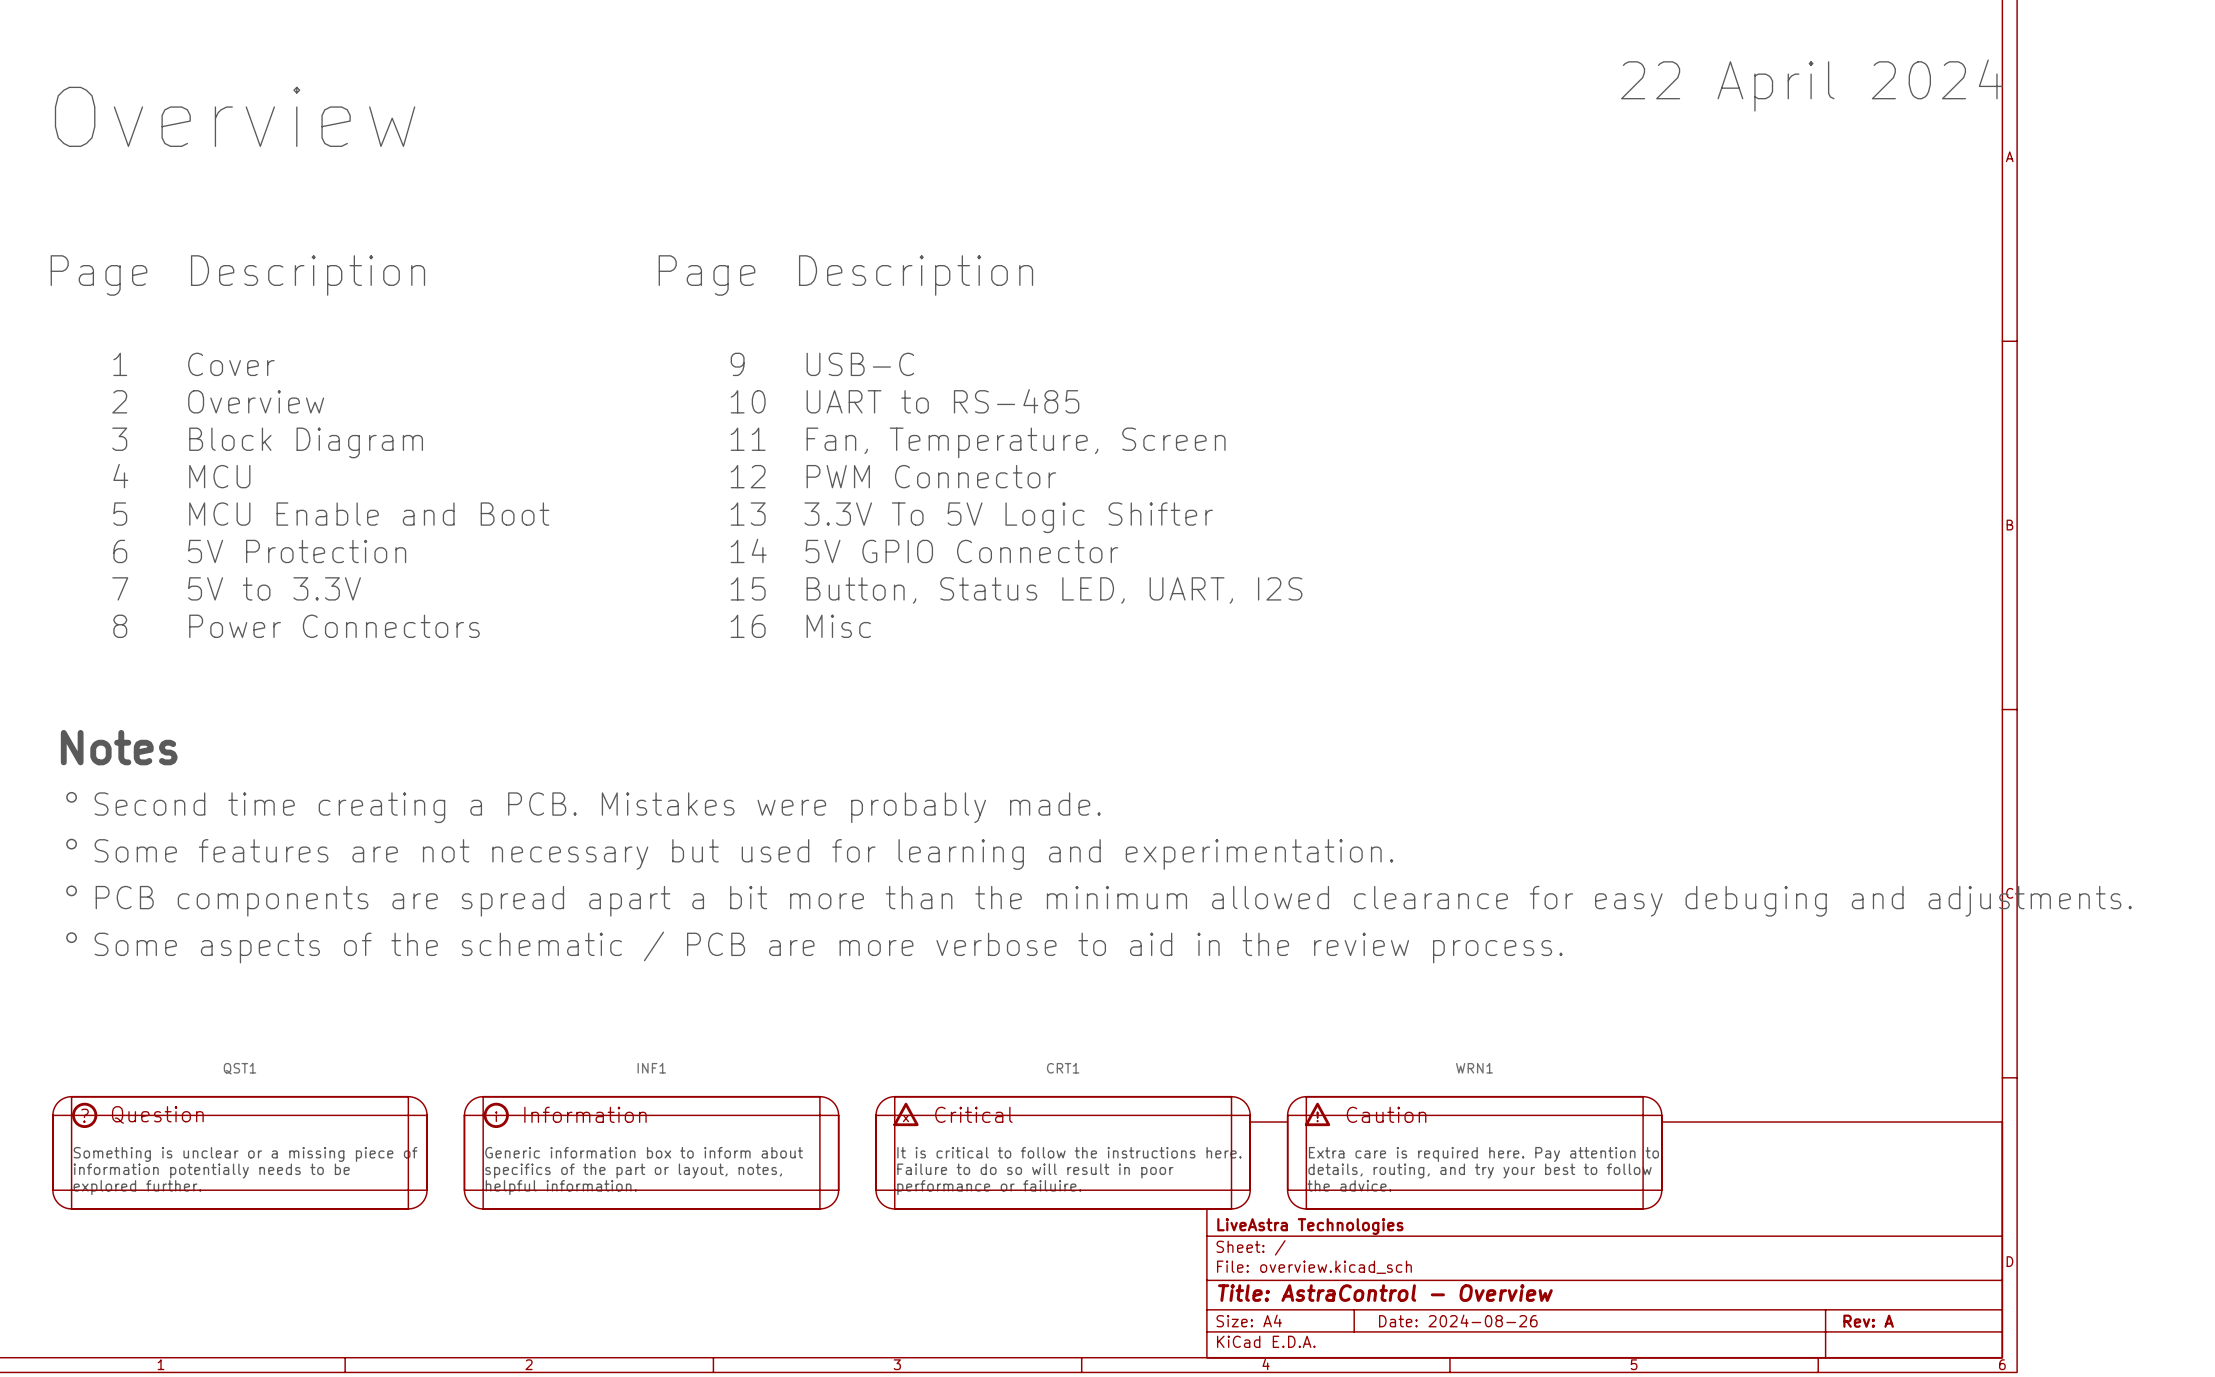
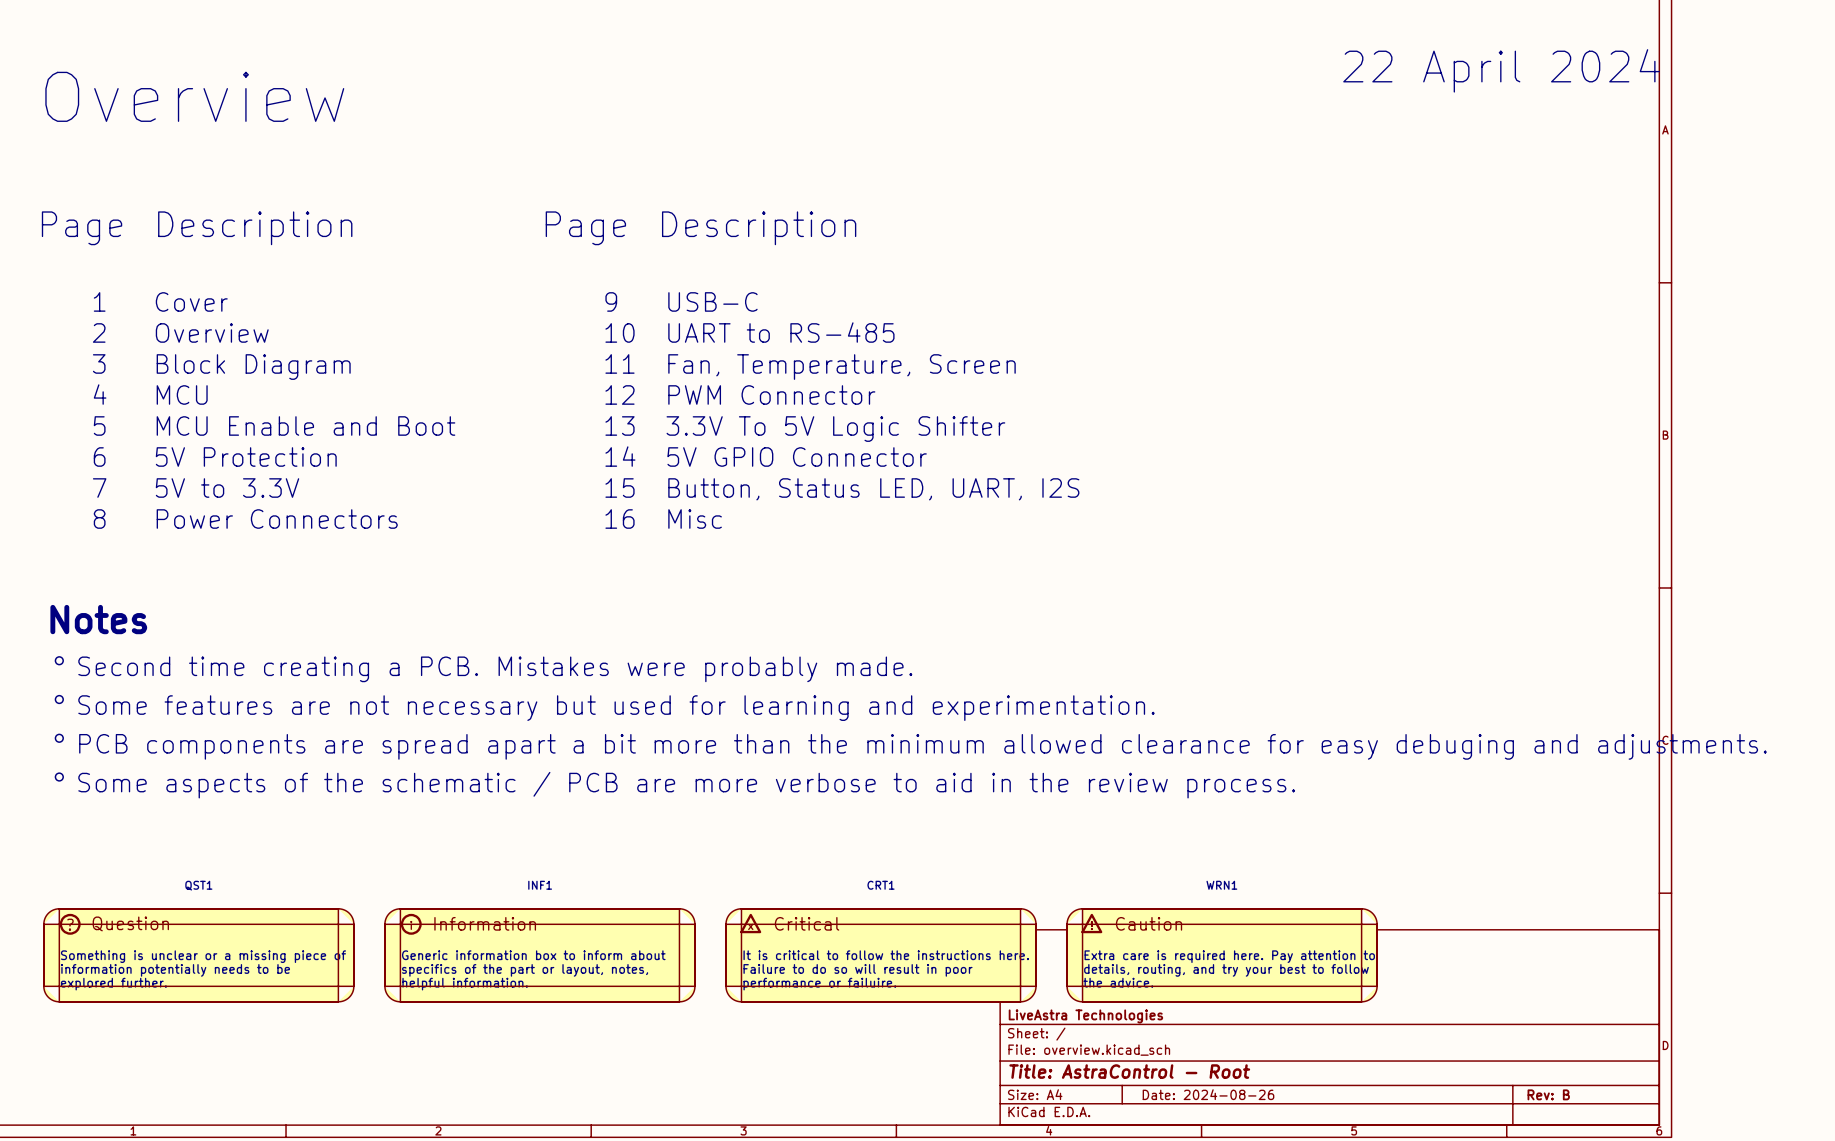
title block: Title: AstraControl - Overview (1385, 1293) -> Title: AstraControl - Root (1129, 1071)
title block: Rev: A (1868, 1321) -> Rev: B (1548, 1094)

